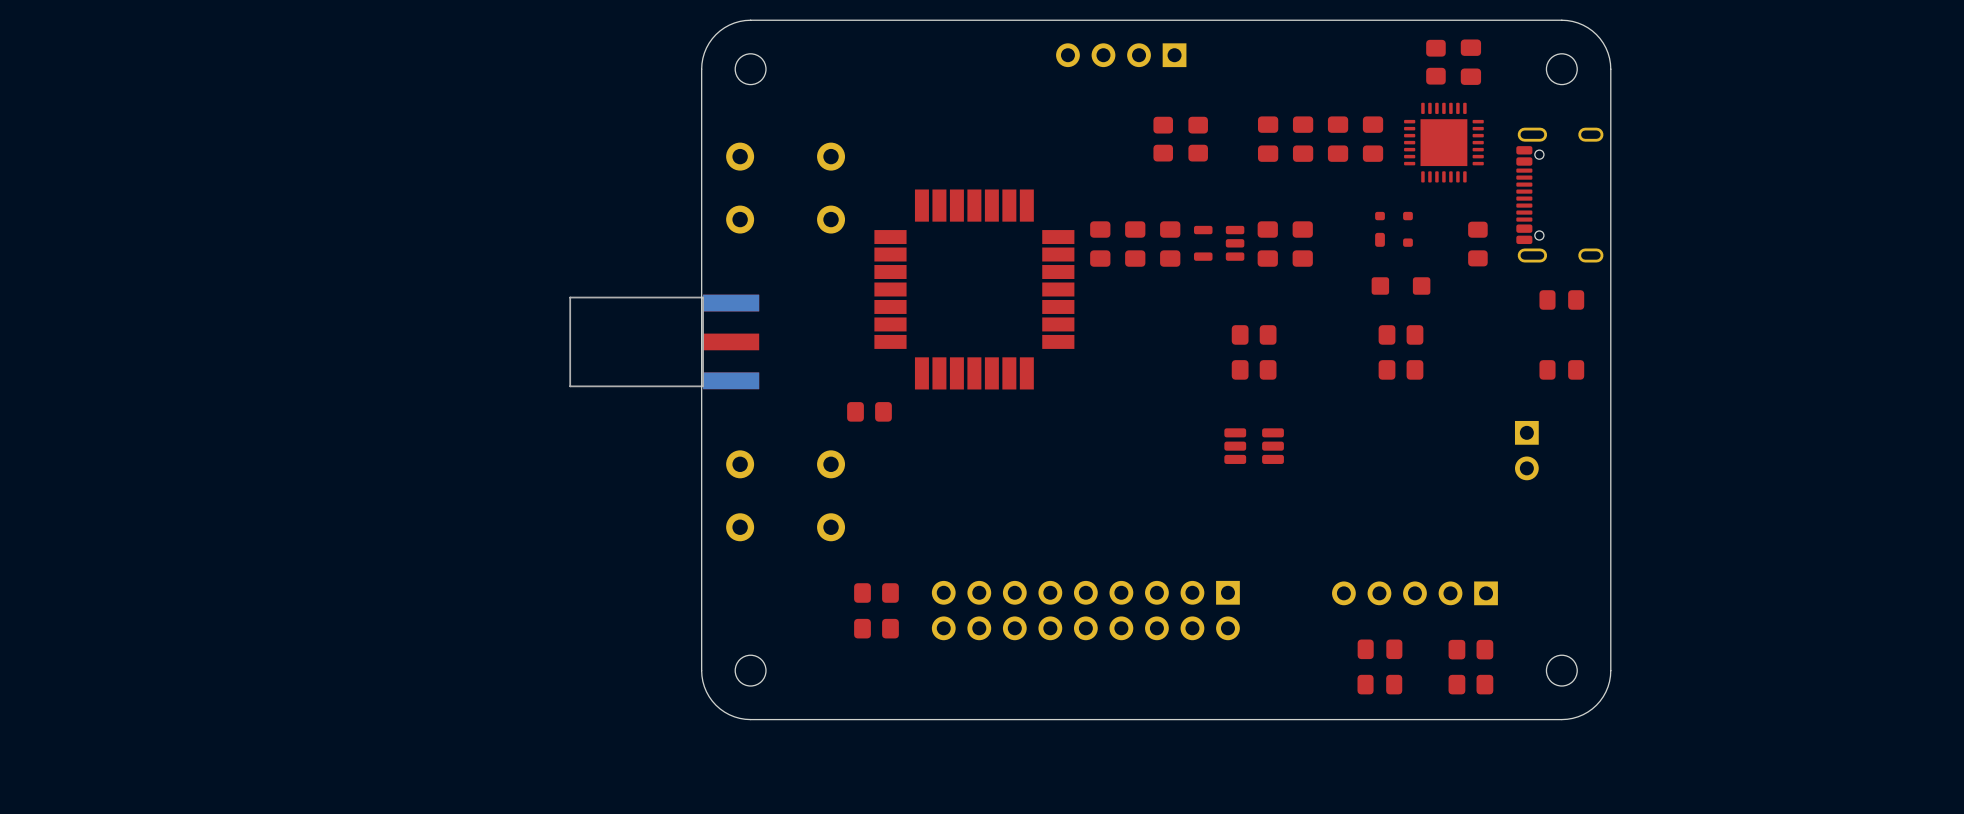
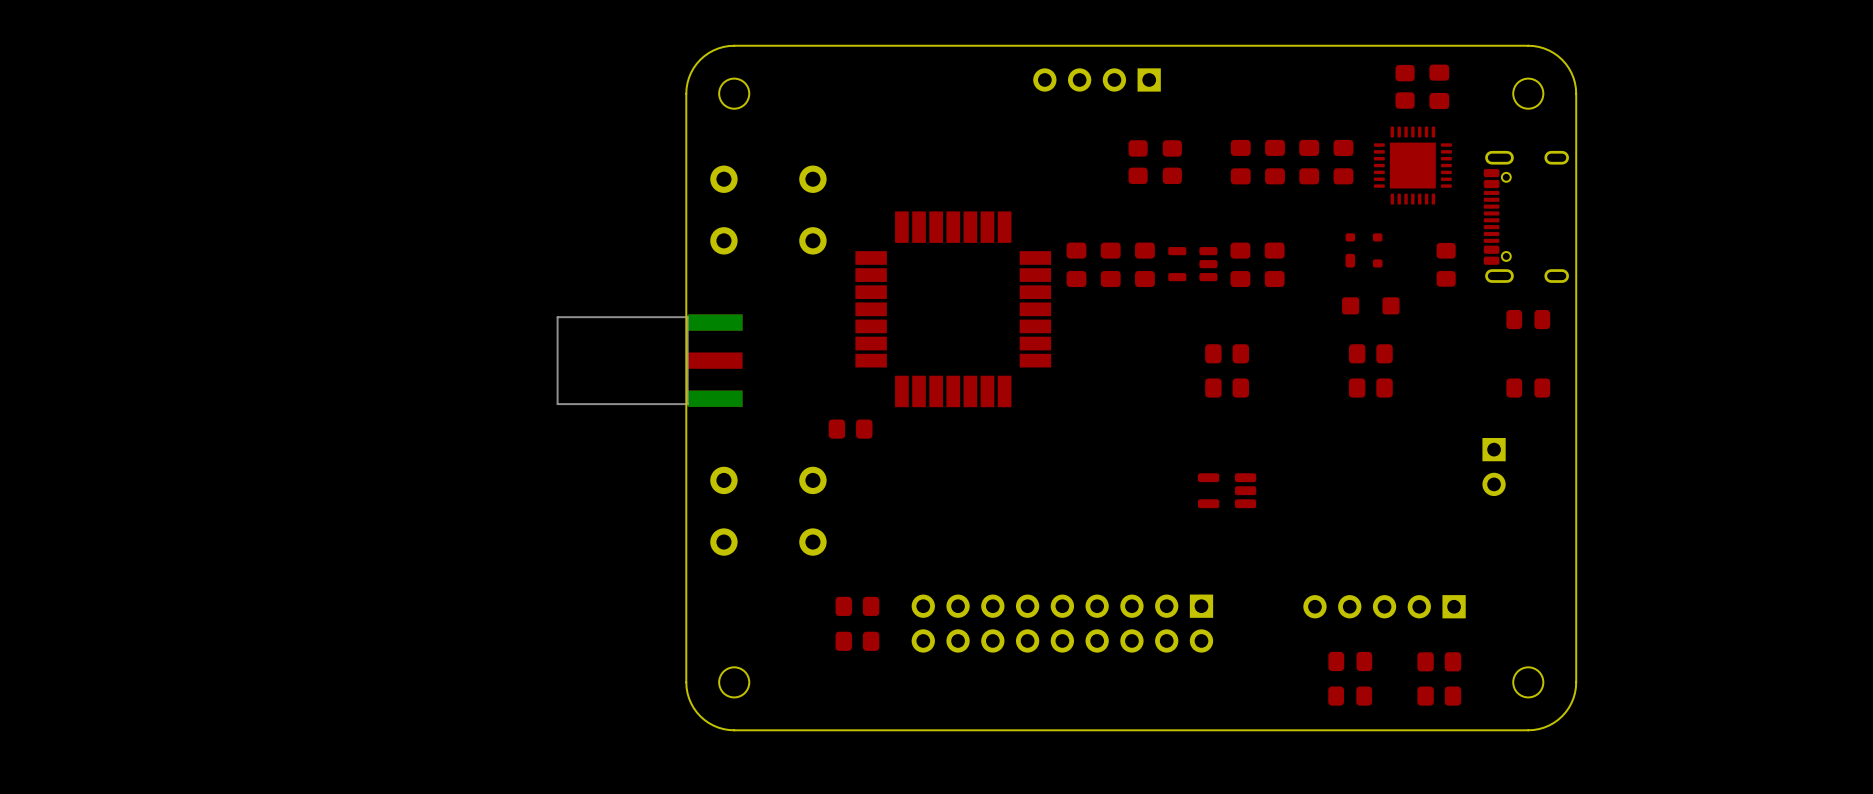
part: (1254, 446) -> none
part: none -> (1227, 490)

